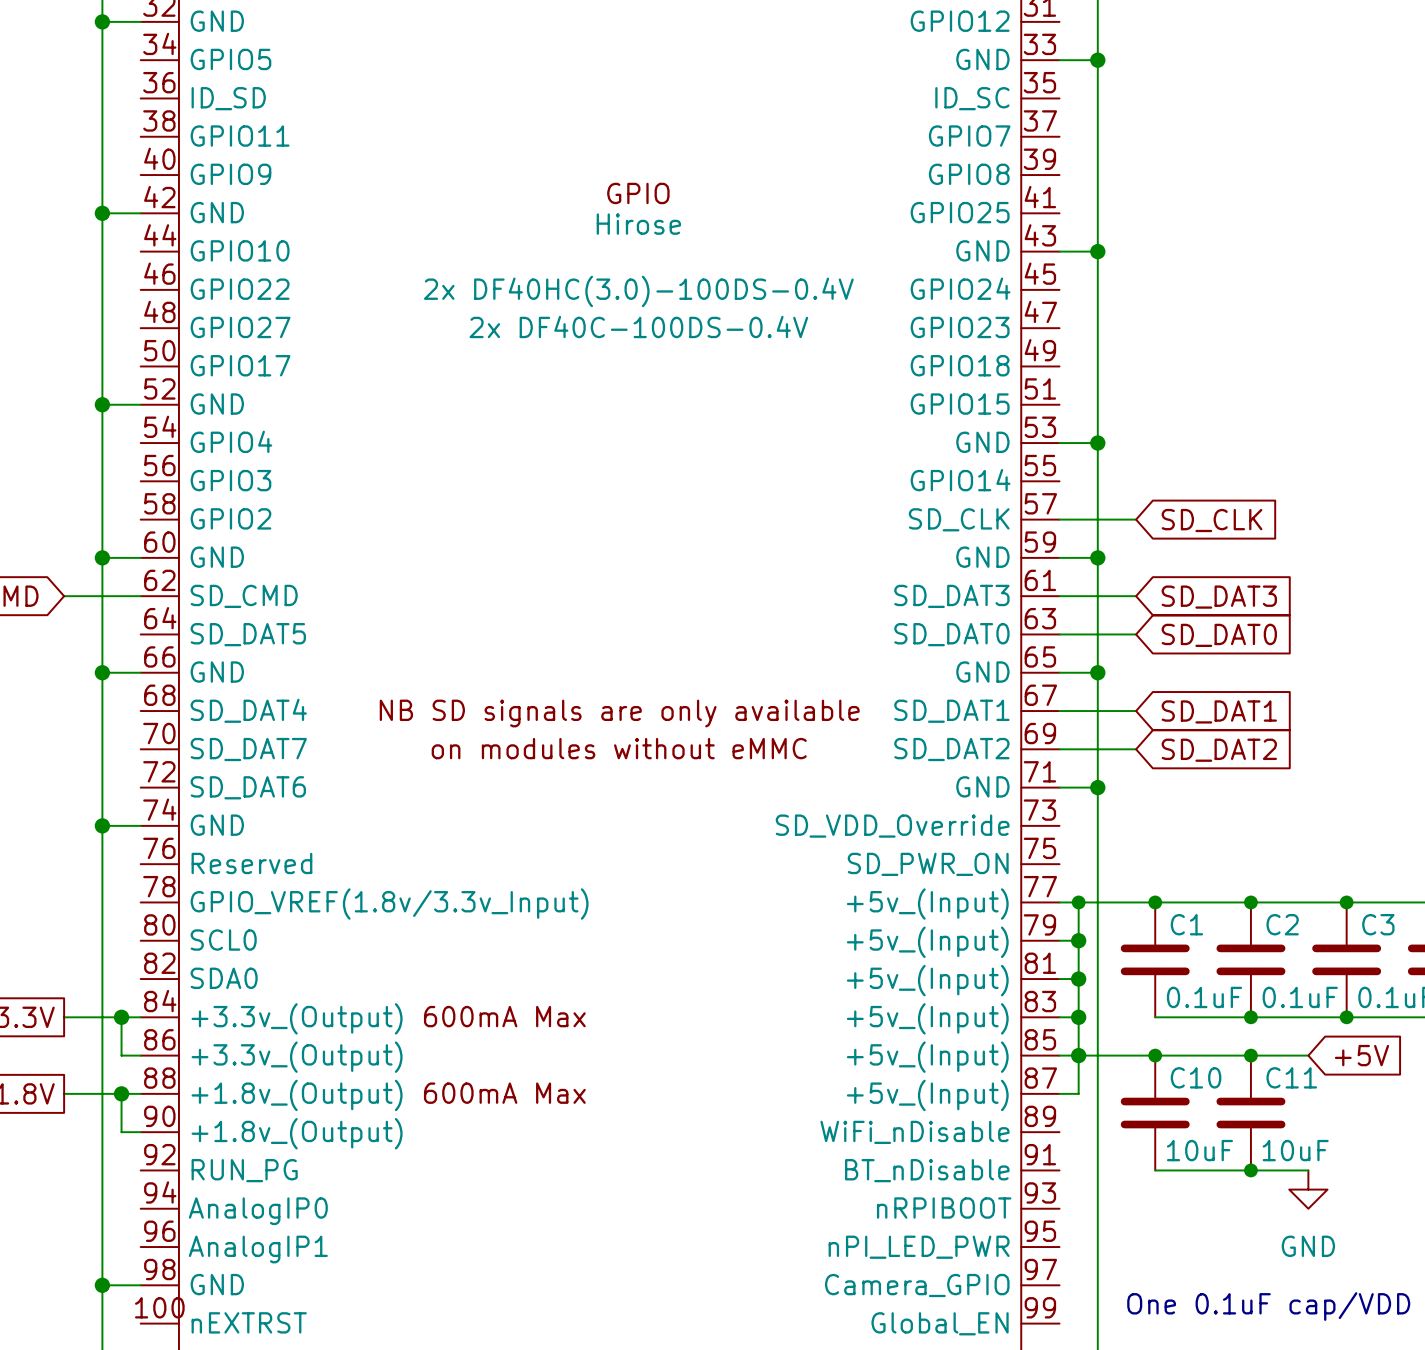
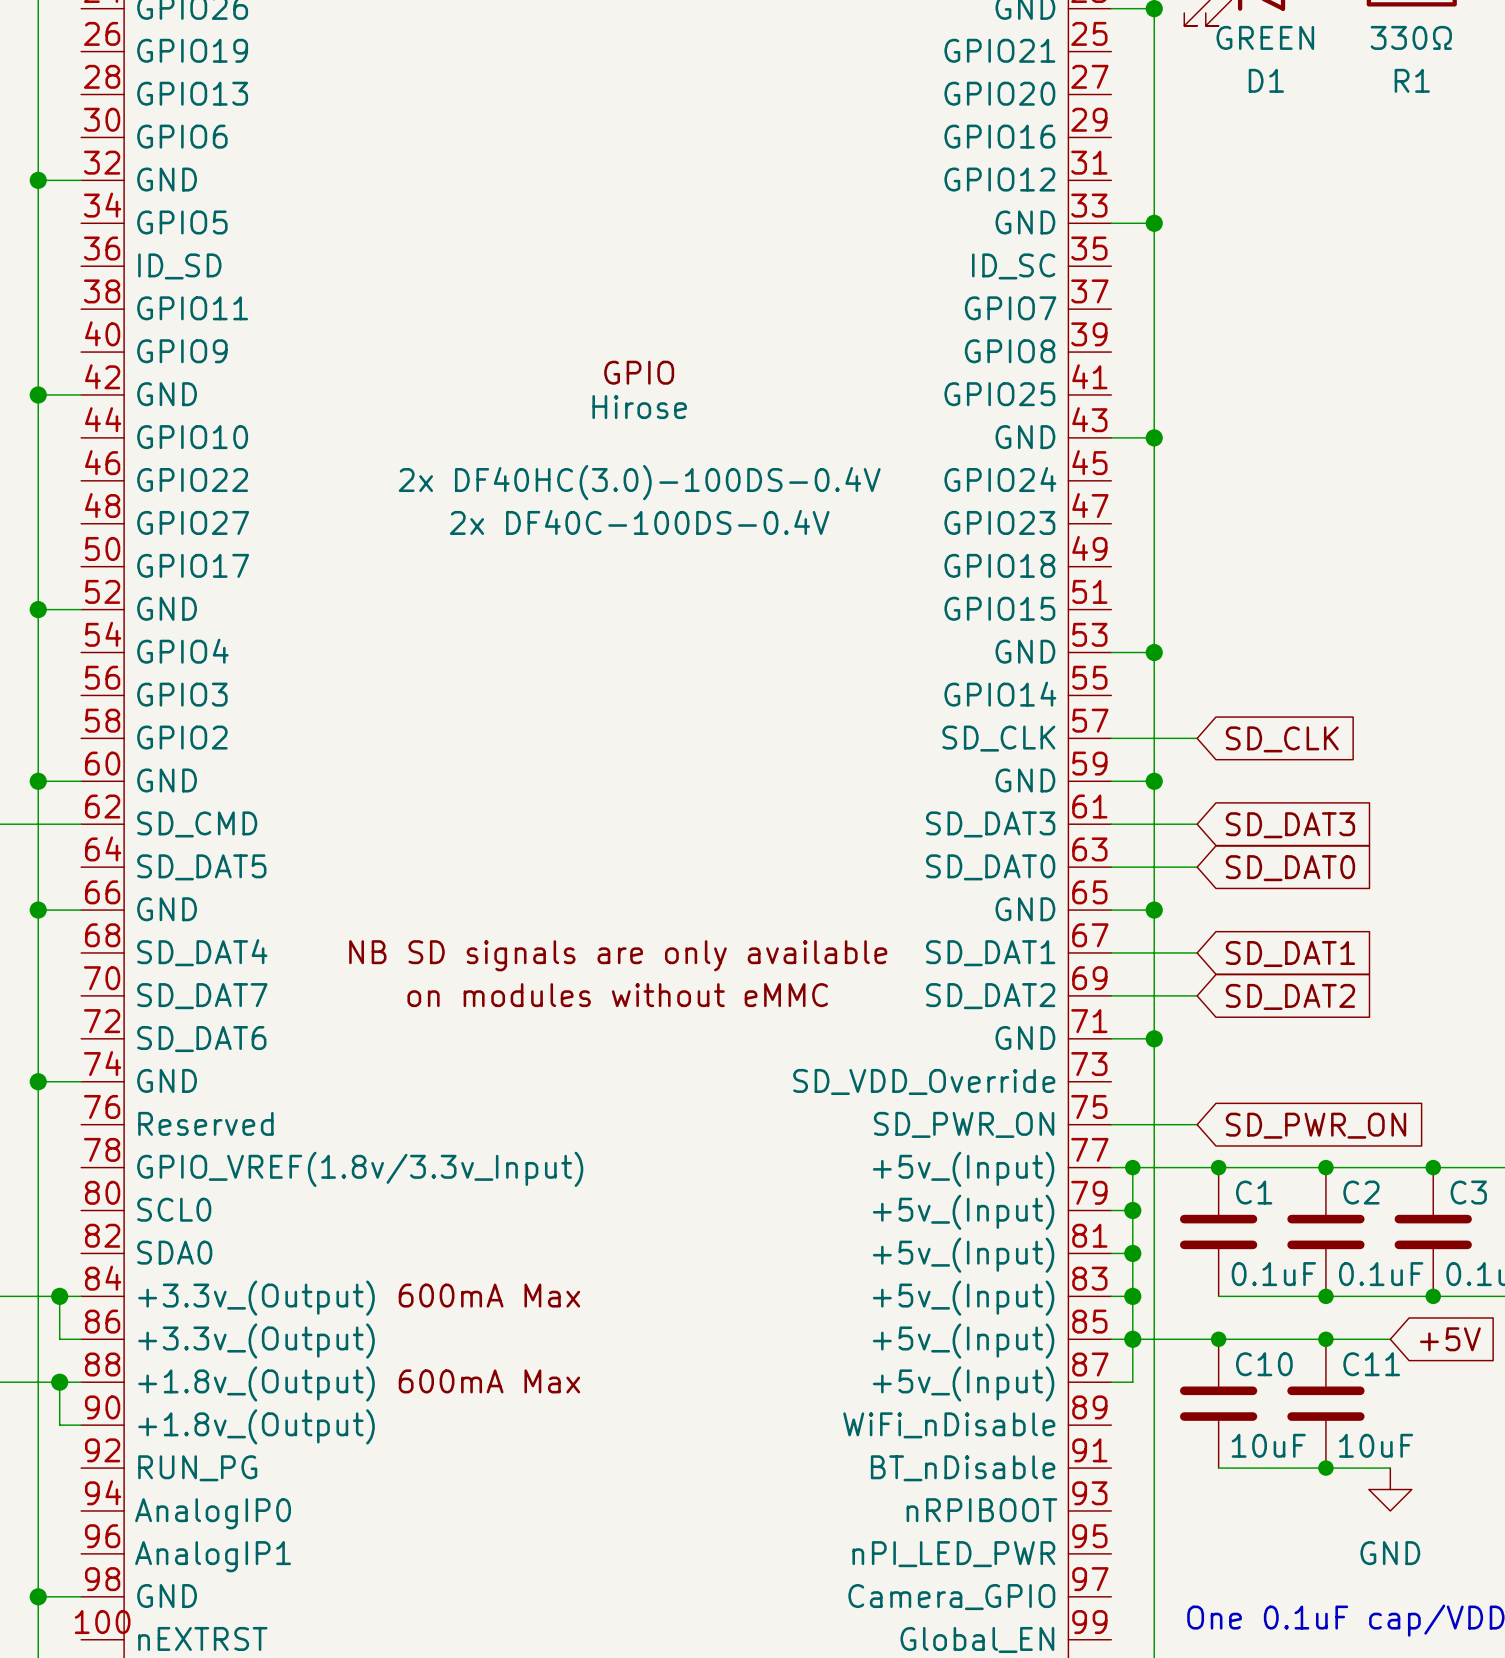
wire: none -> (1111, 1124) (1197, 1124)
global label: none -> SD_PWR_ON (1316, 1125)

